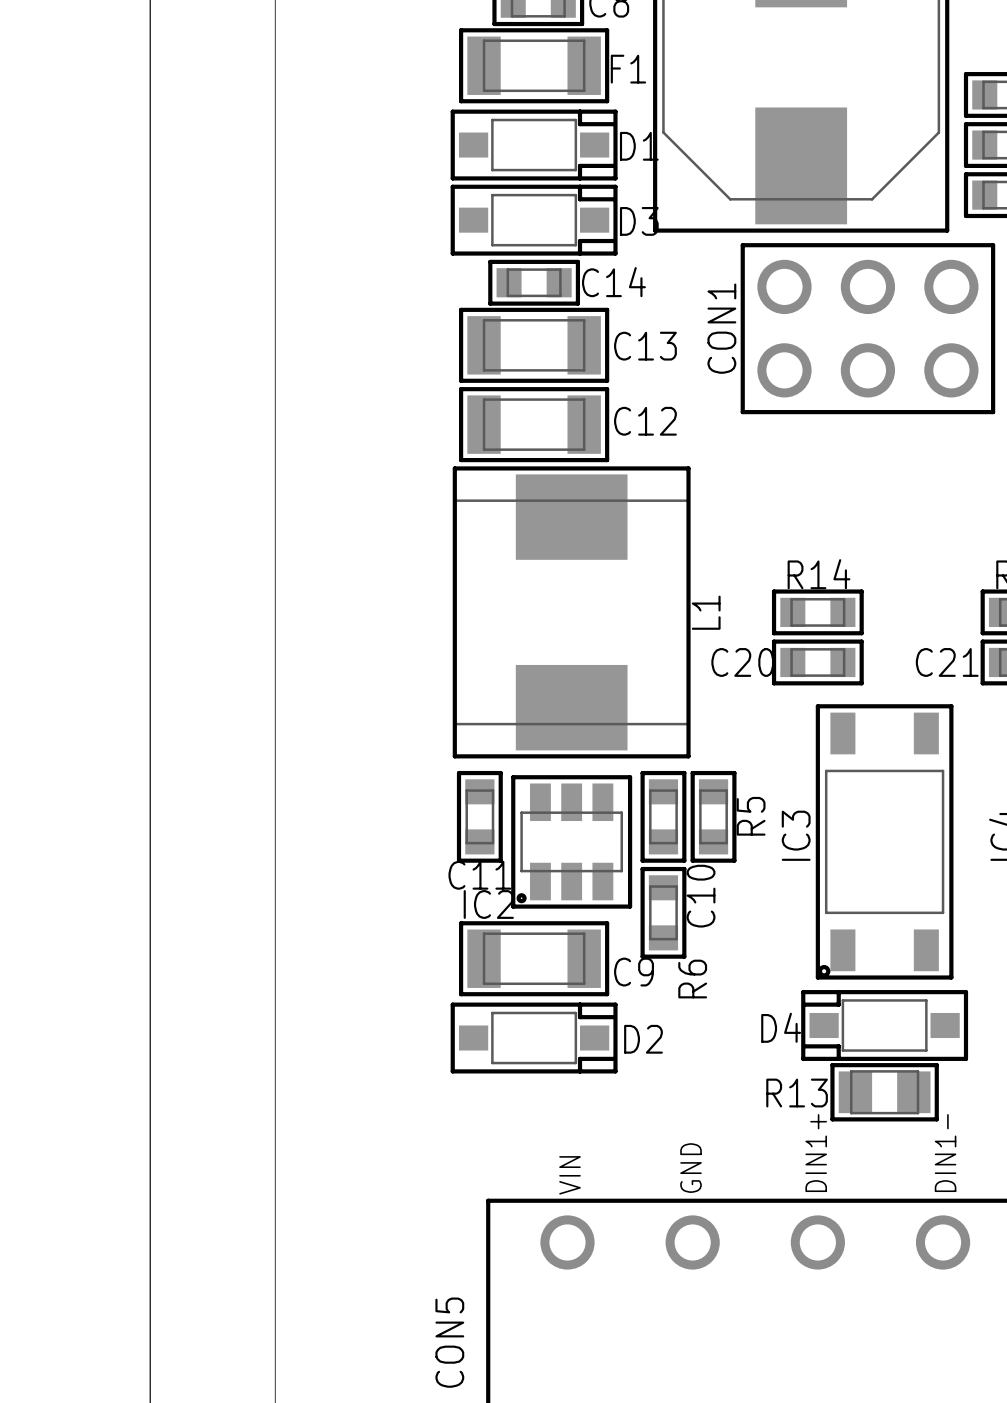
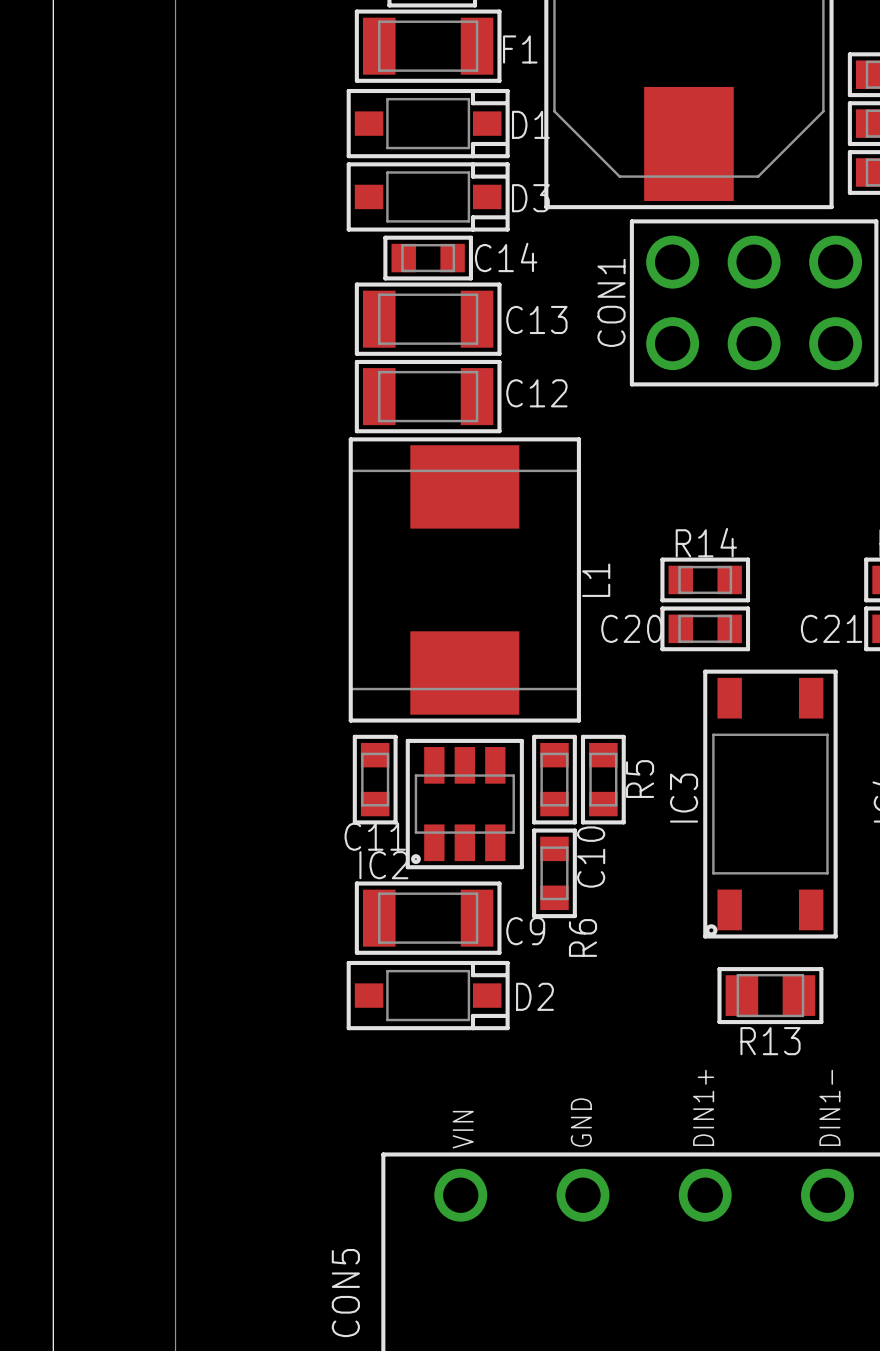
D4: (884, 1025) -> none
R13 position: (884, 1092) -> (770, 995)
R13 name position: R13 (797, 1093) -> R13 (770, 1041)

